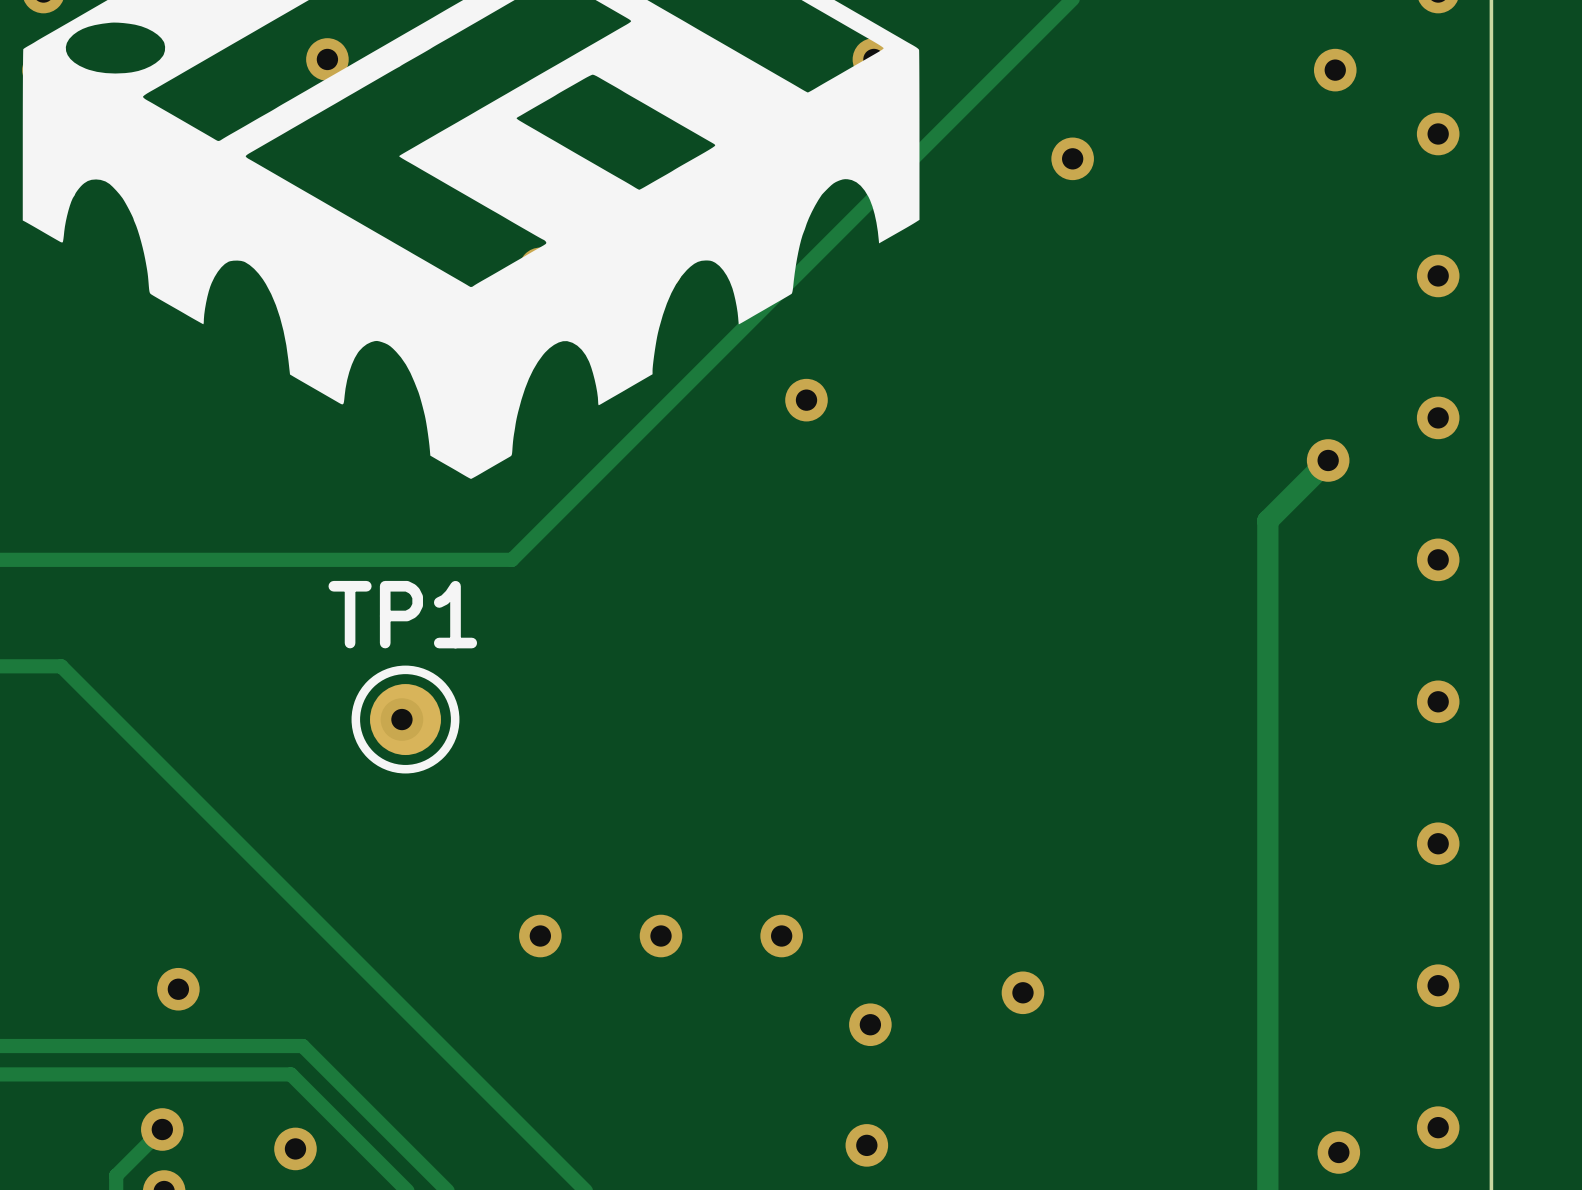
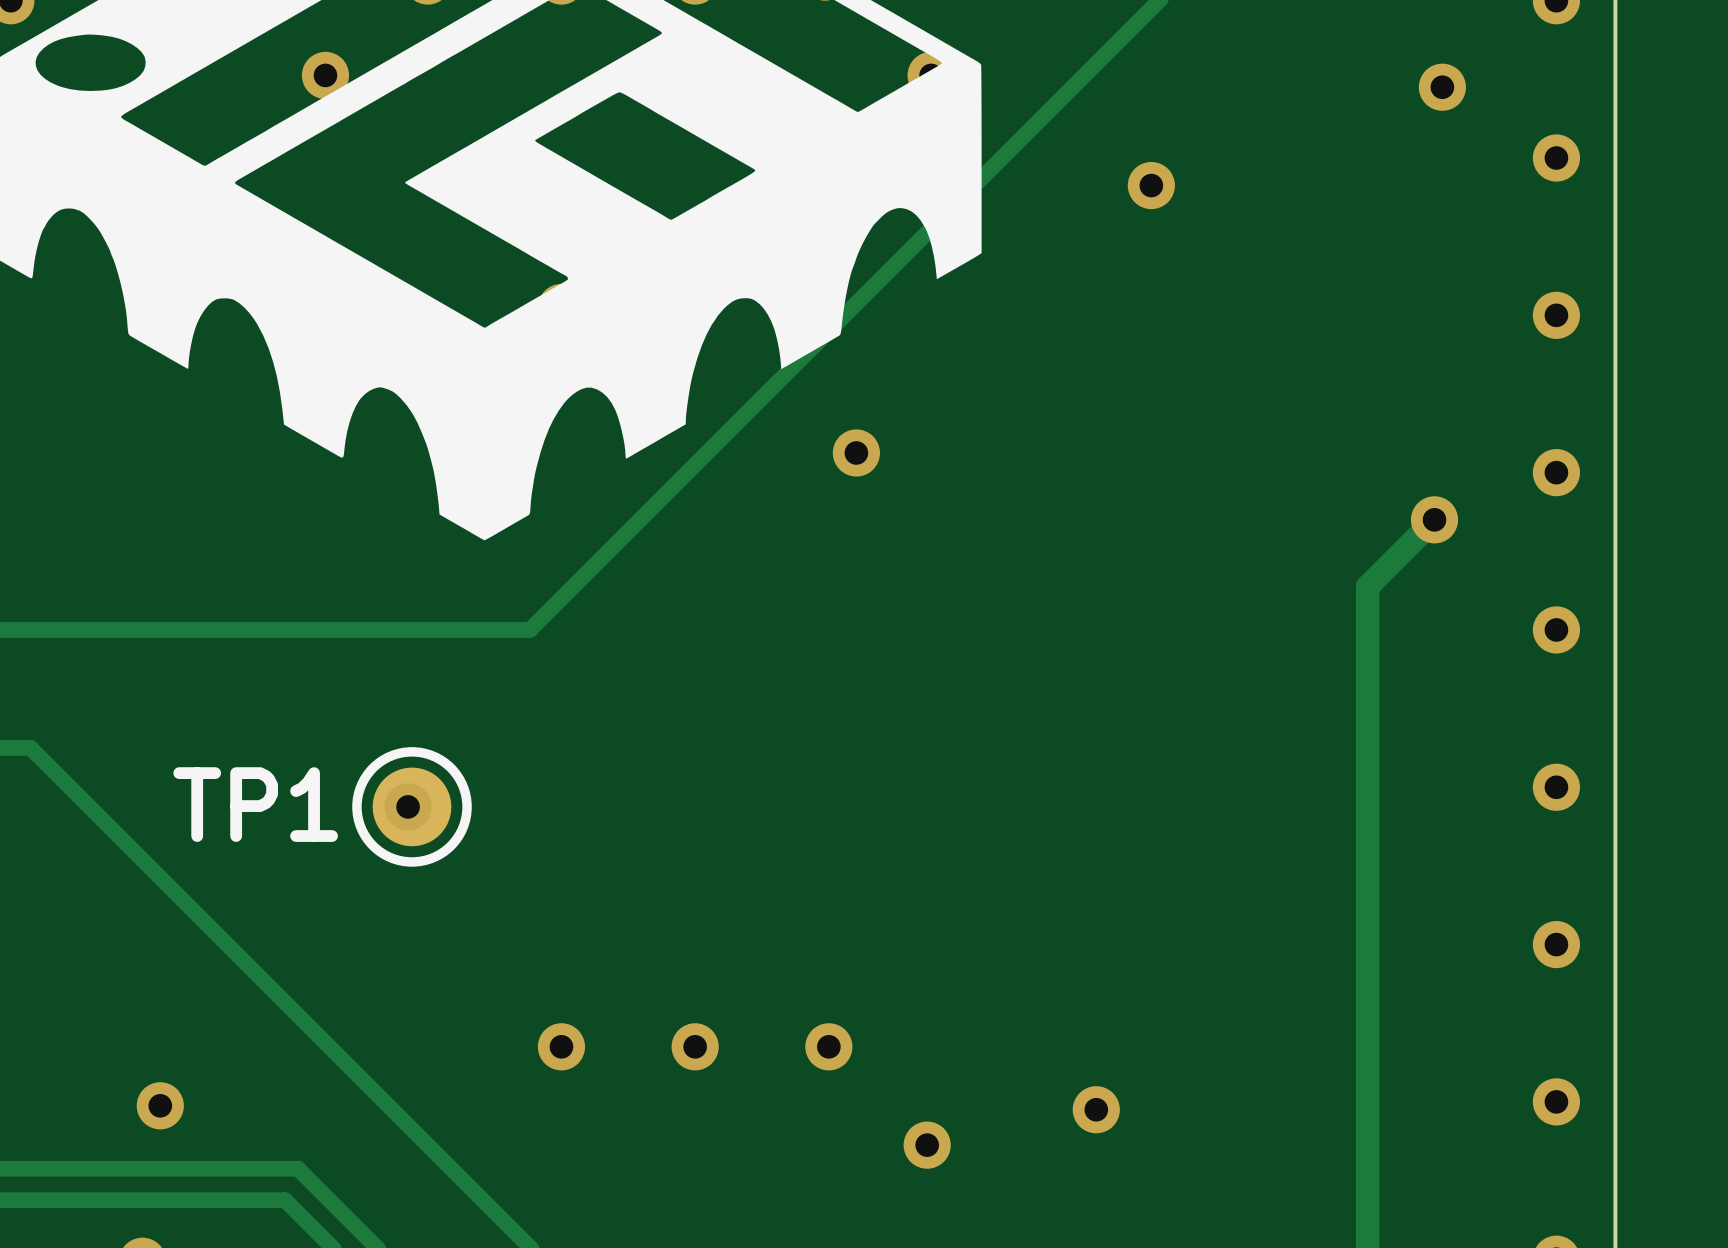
TP1 name position: TP1 (402, 614) -> TP1 (255, 804)

